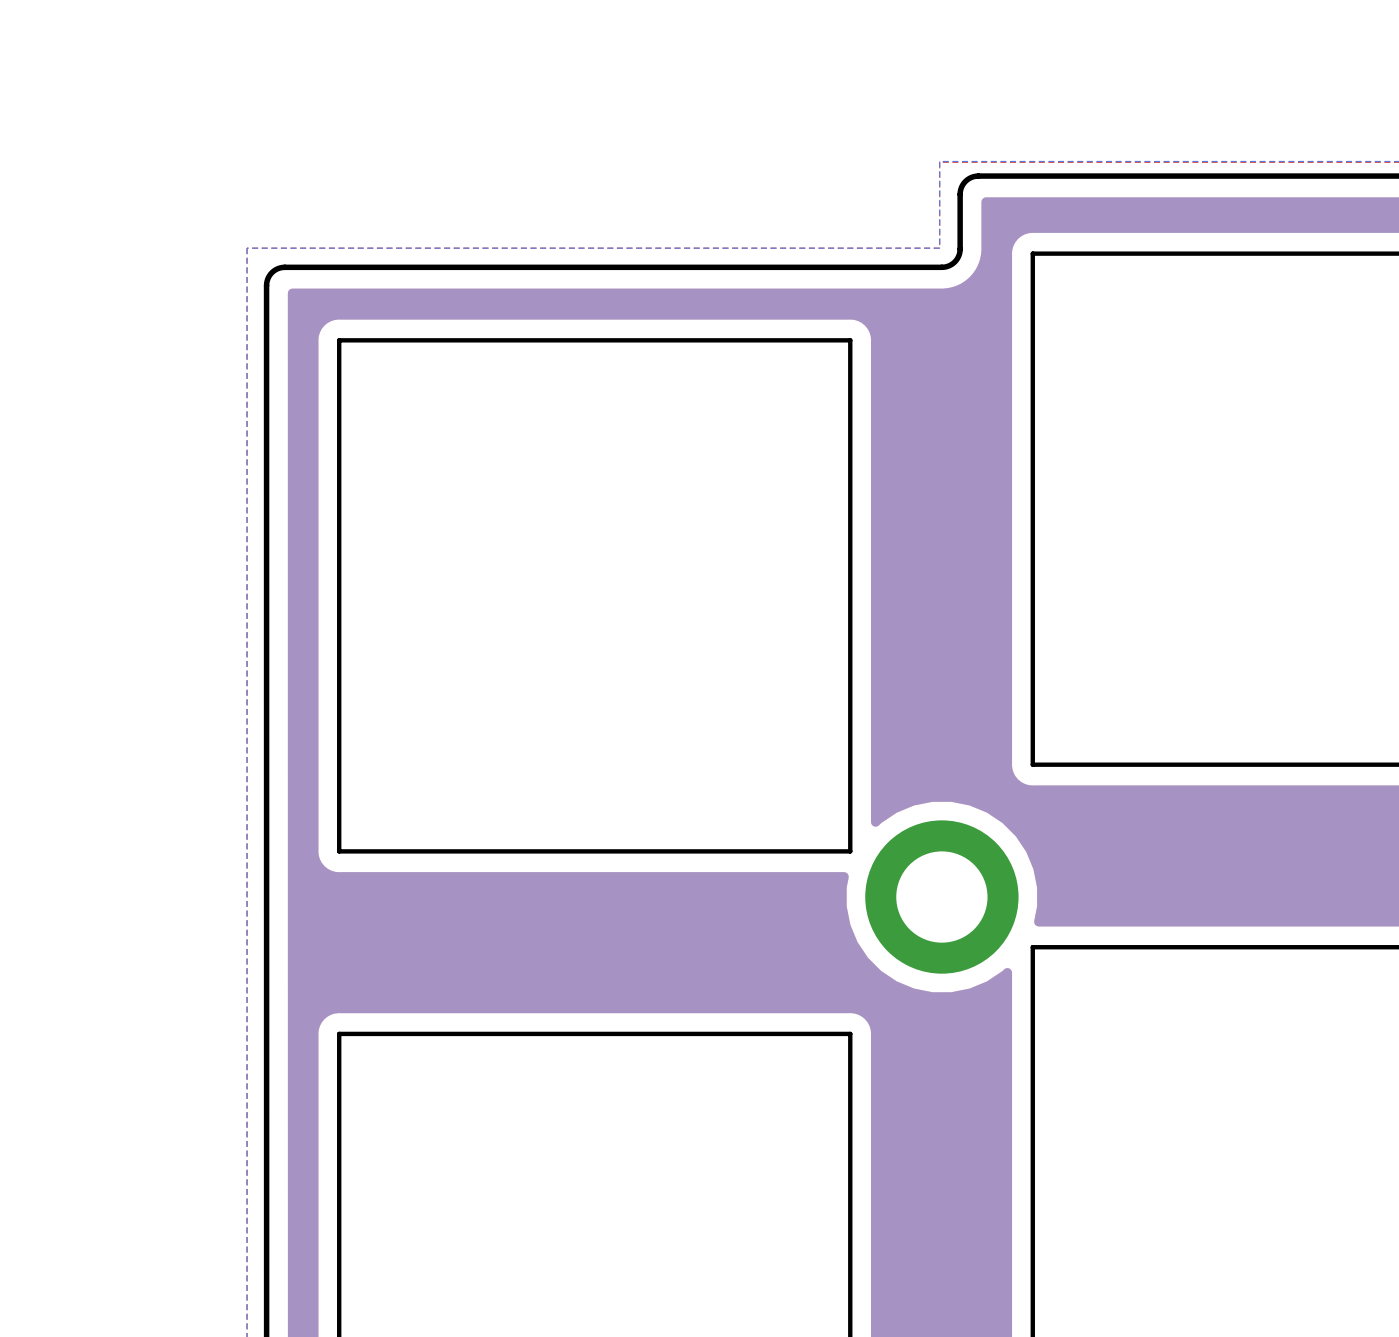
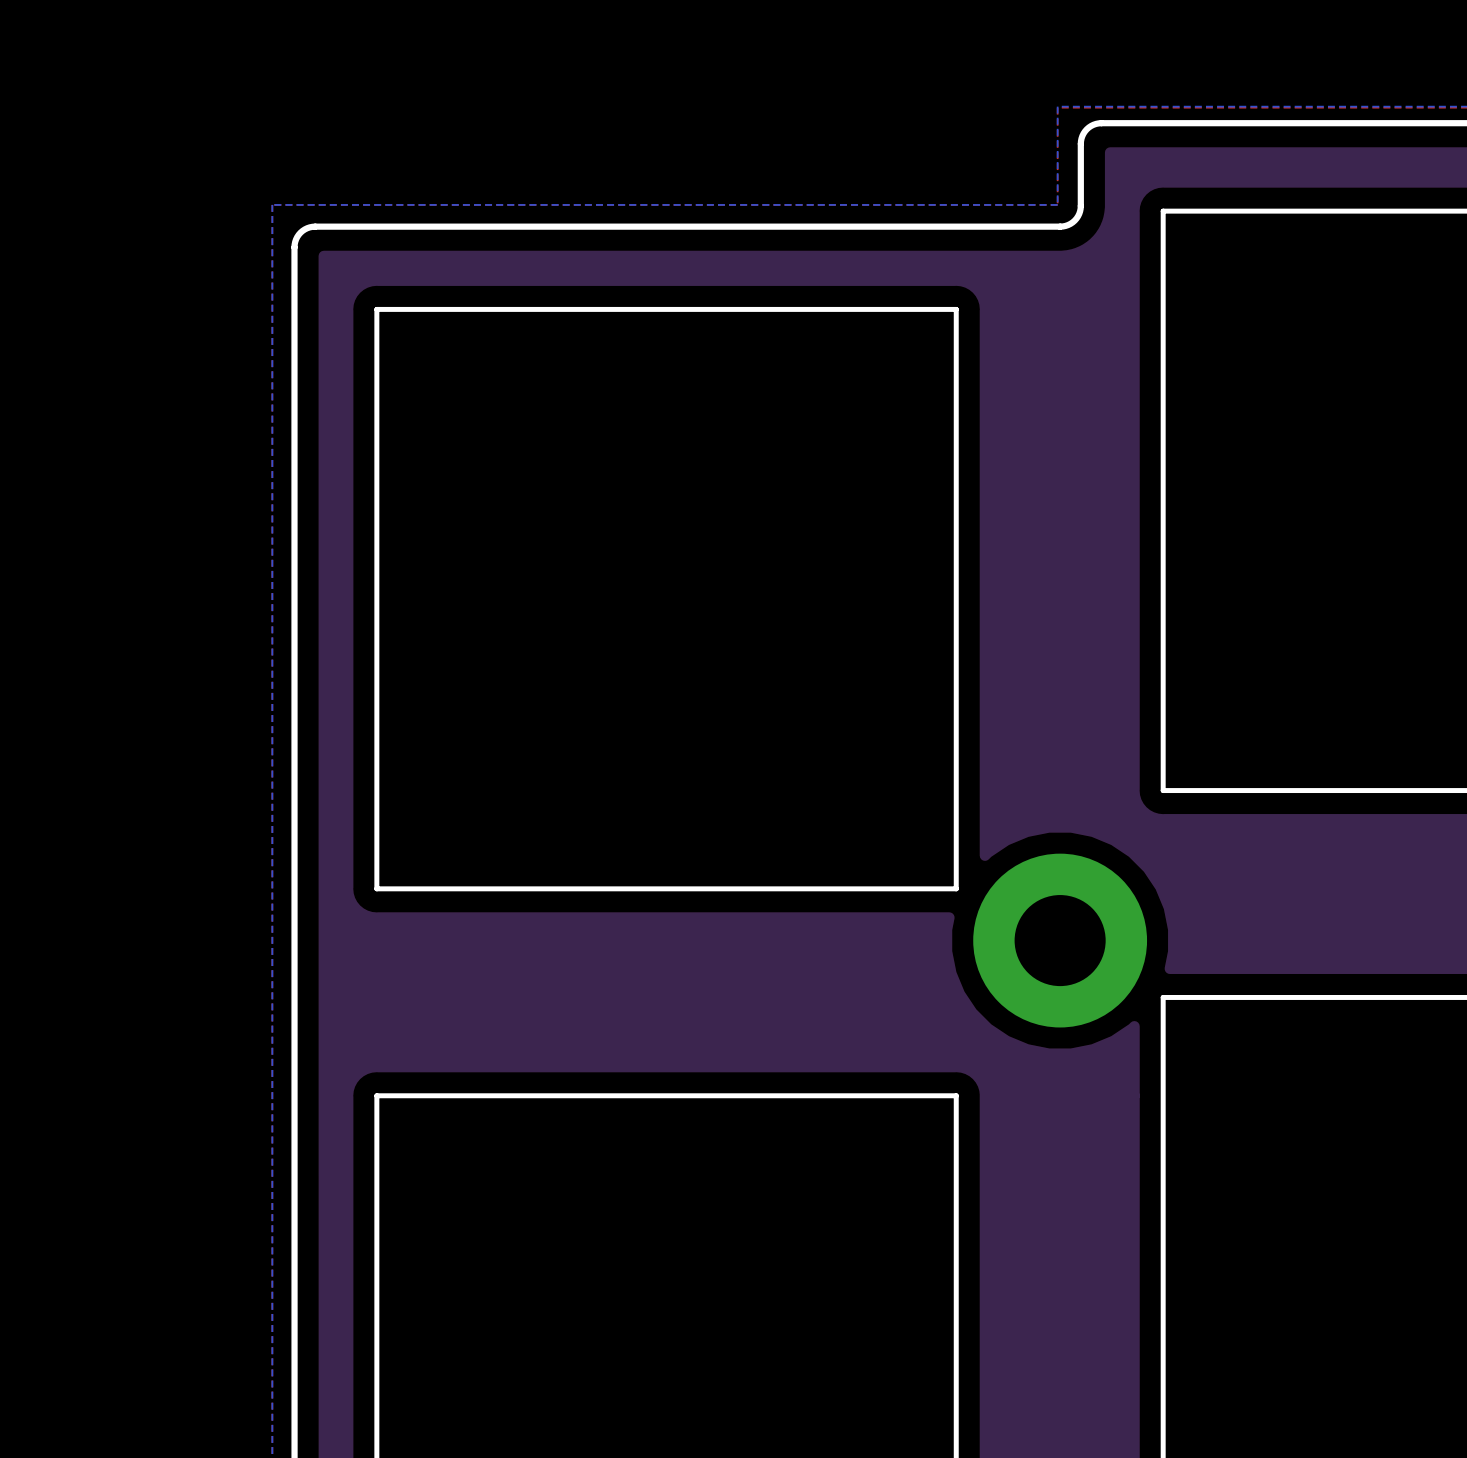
part footprint: [865, 820, 1019, 974] -> [973, 853, 1148, 1028]

